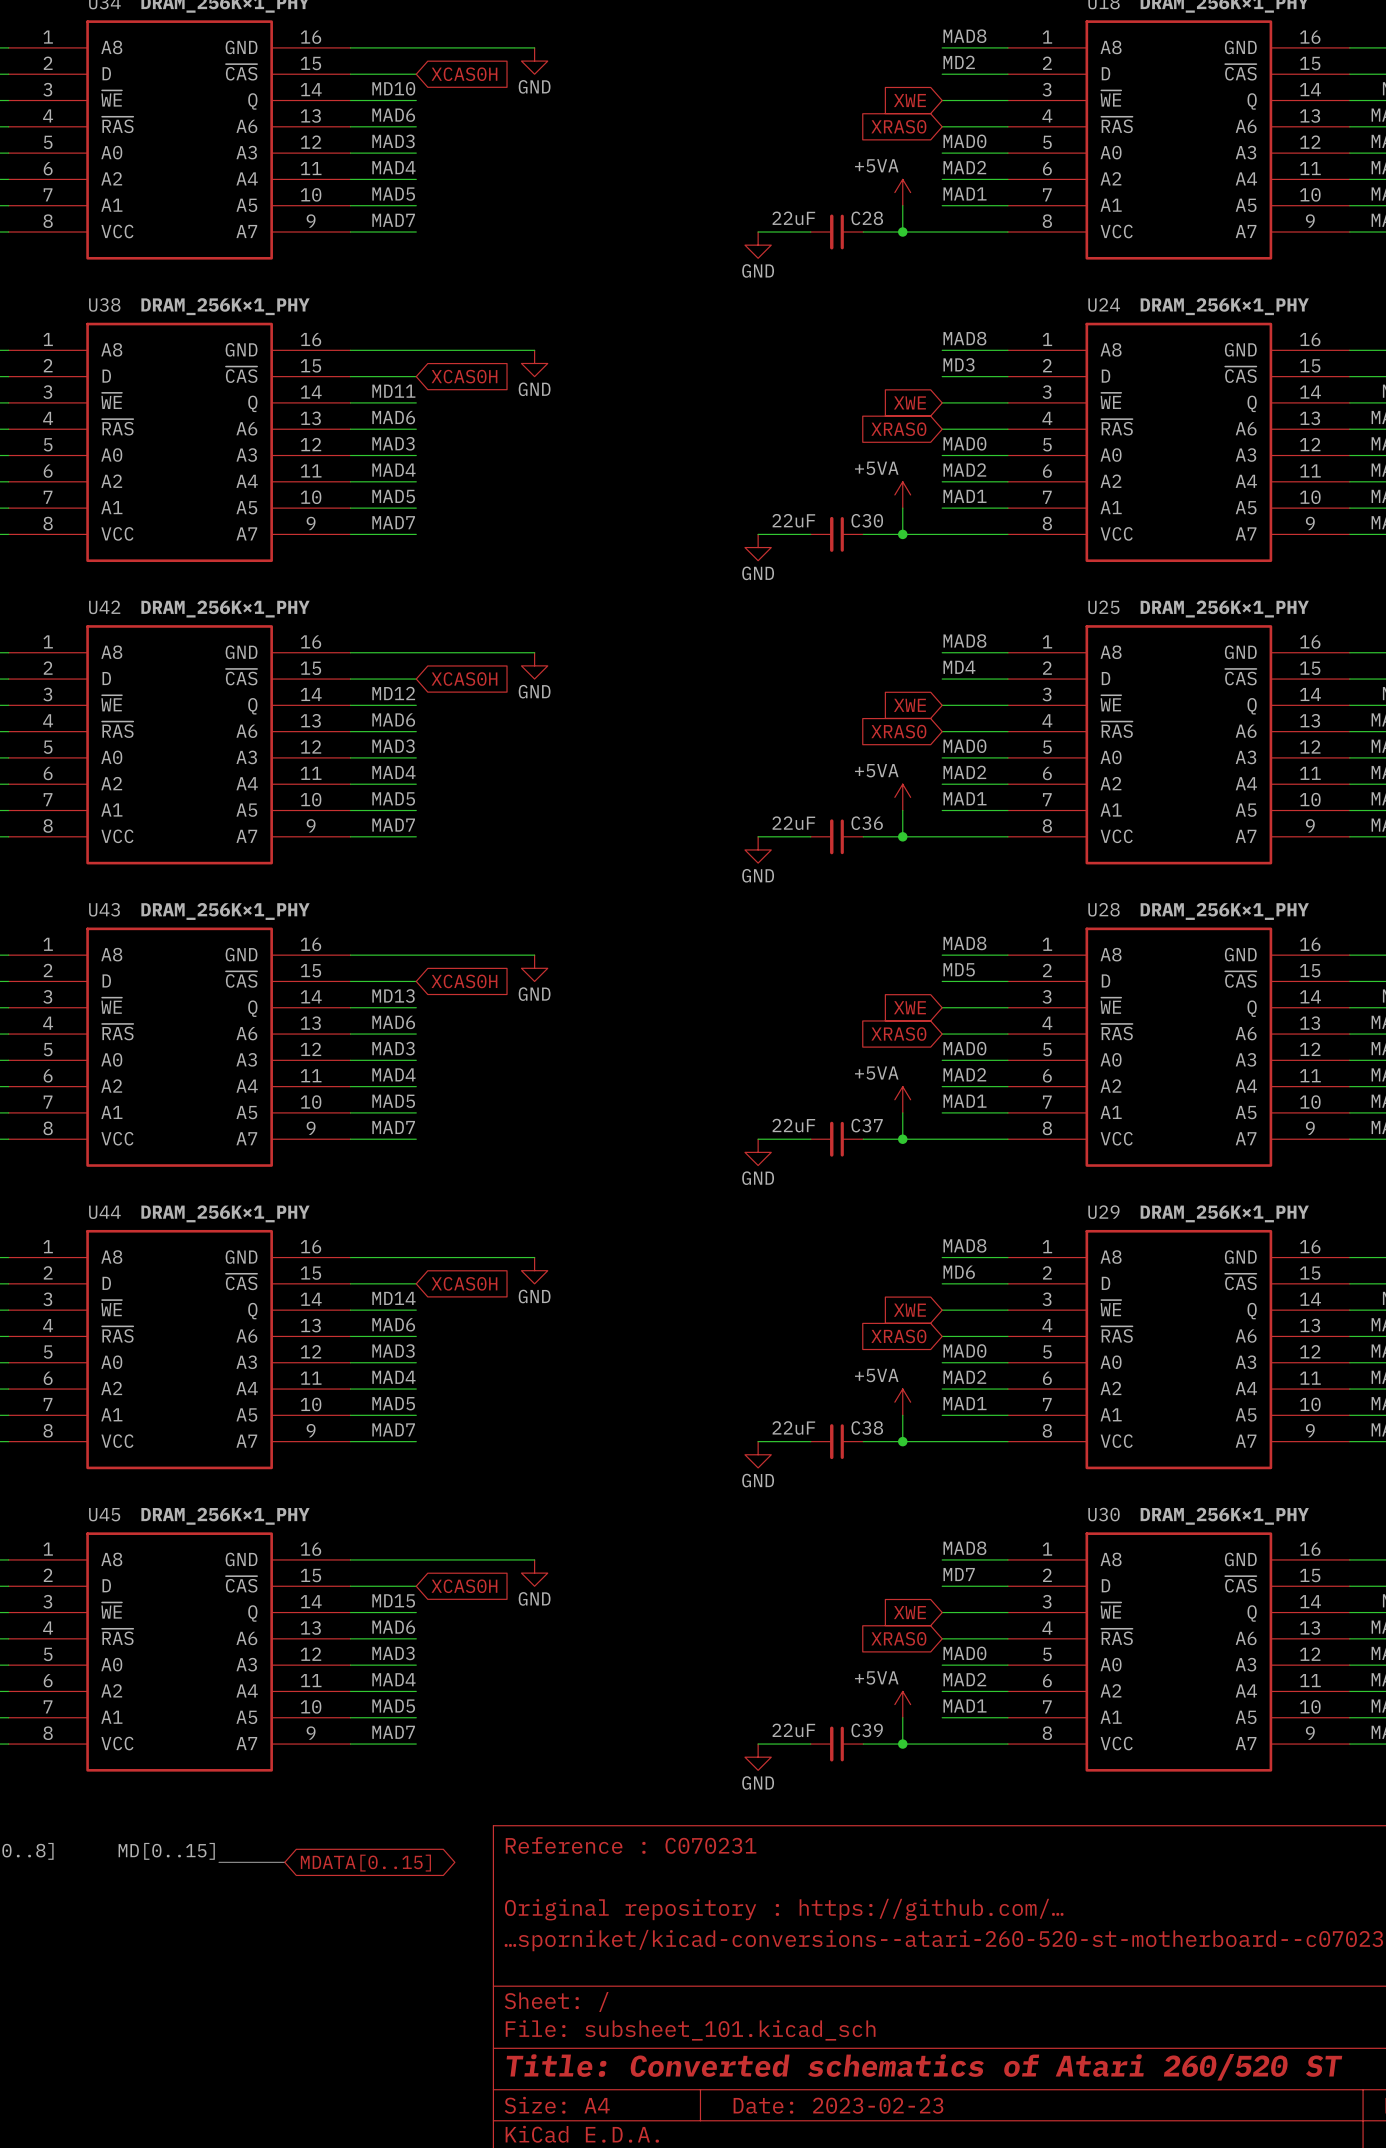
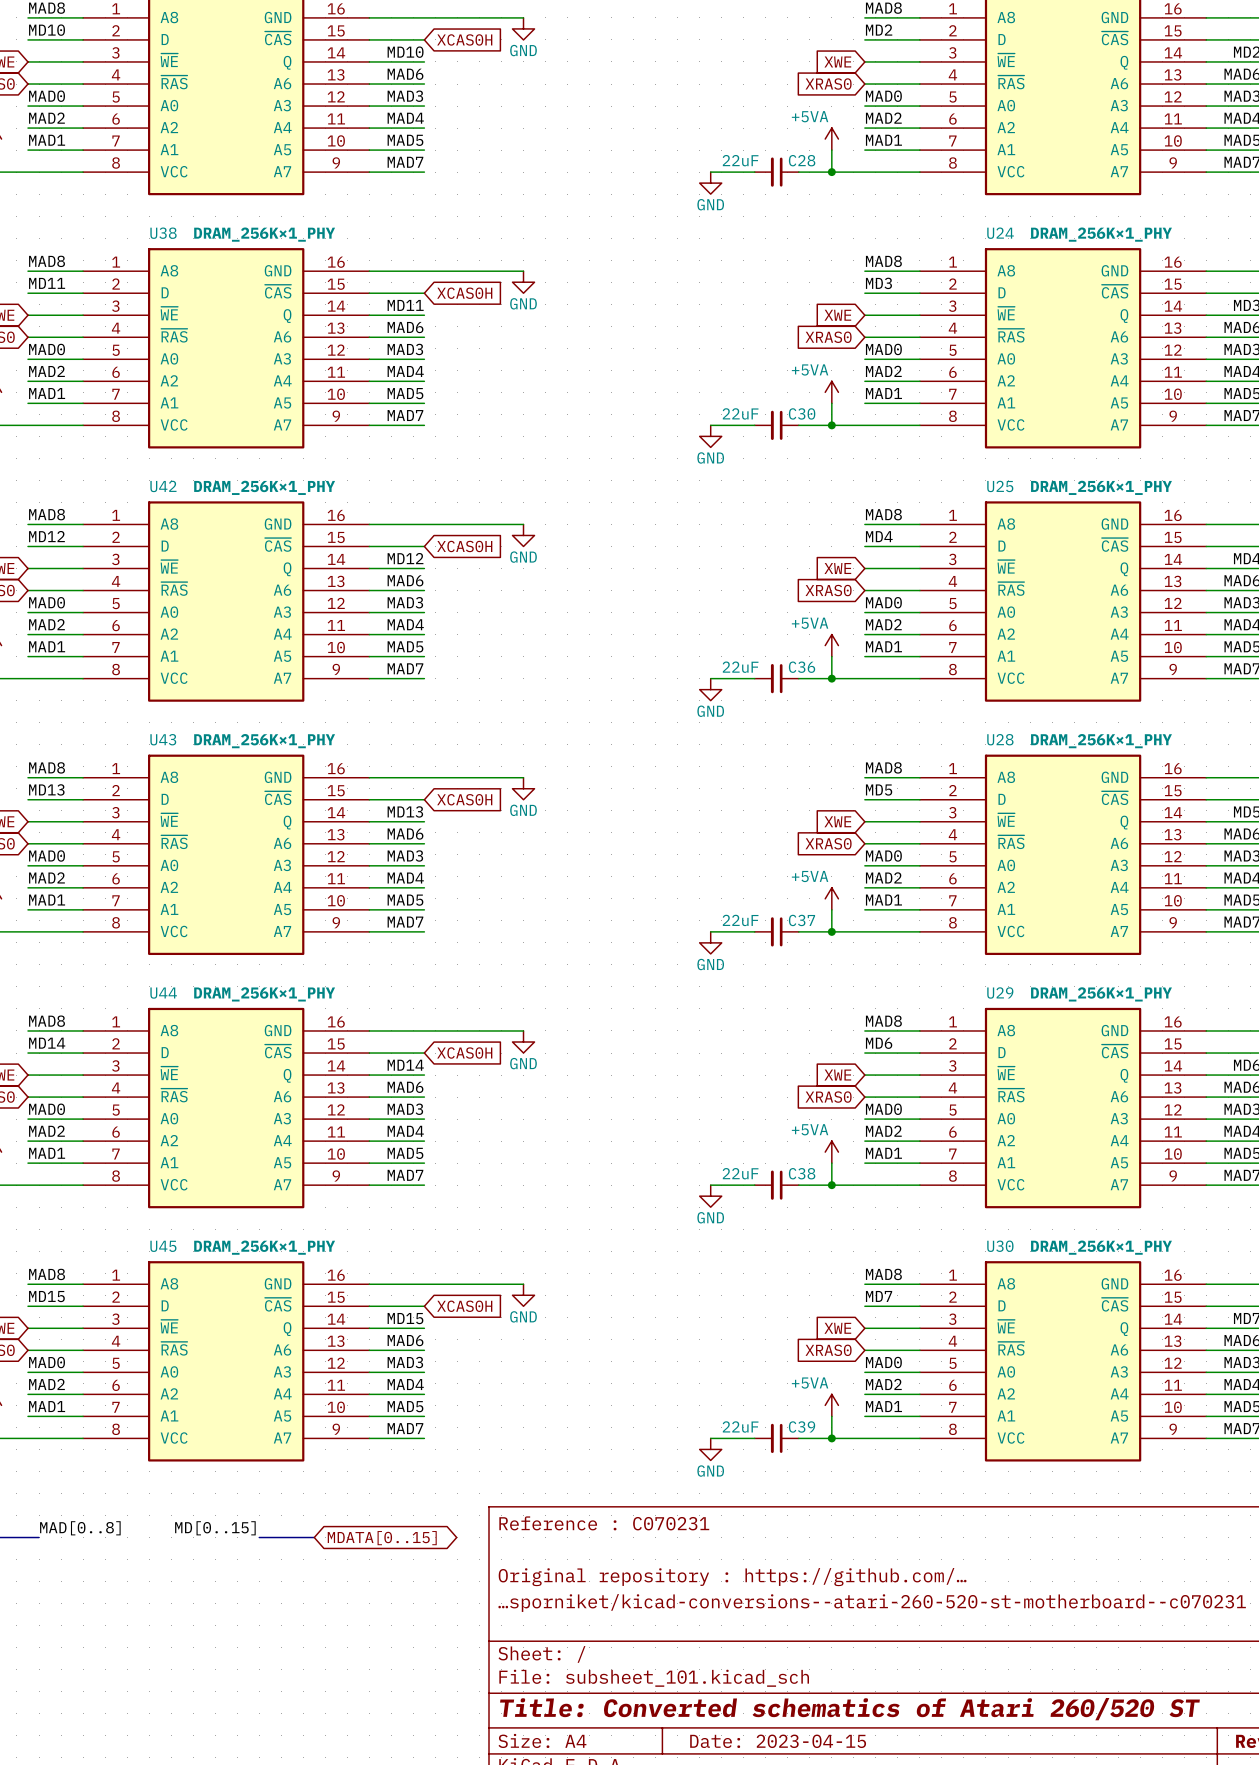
title block: Date: 2023-02-23 (838, 2105) -> Date: 2023-04-15 (778, 1741)

